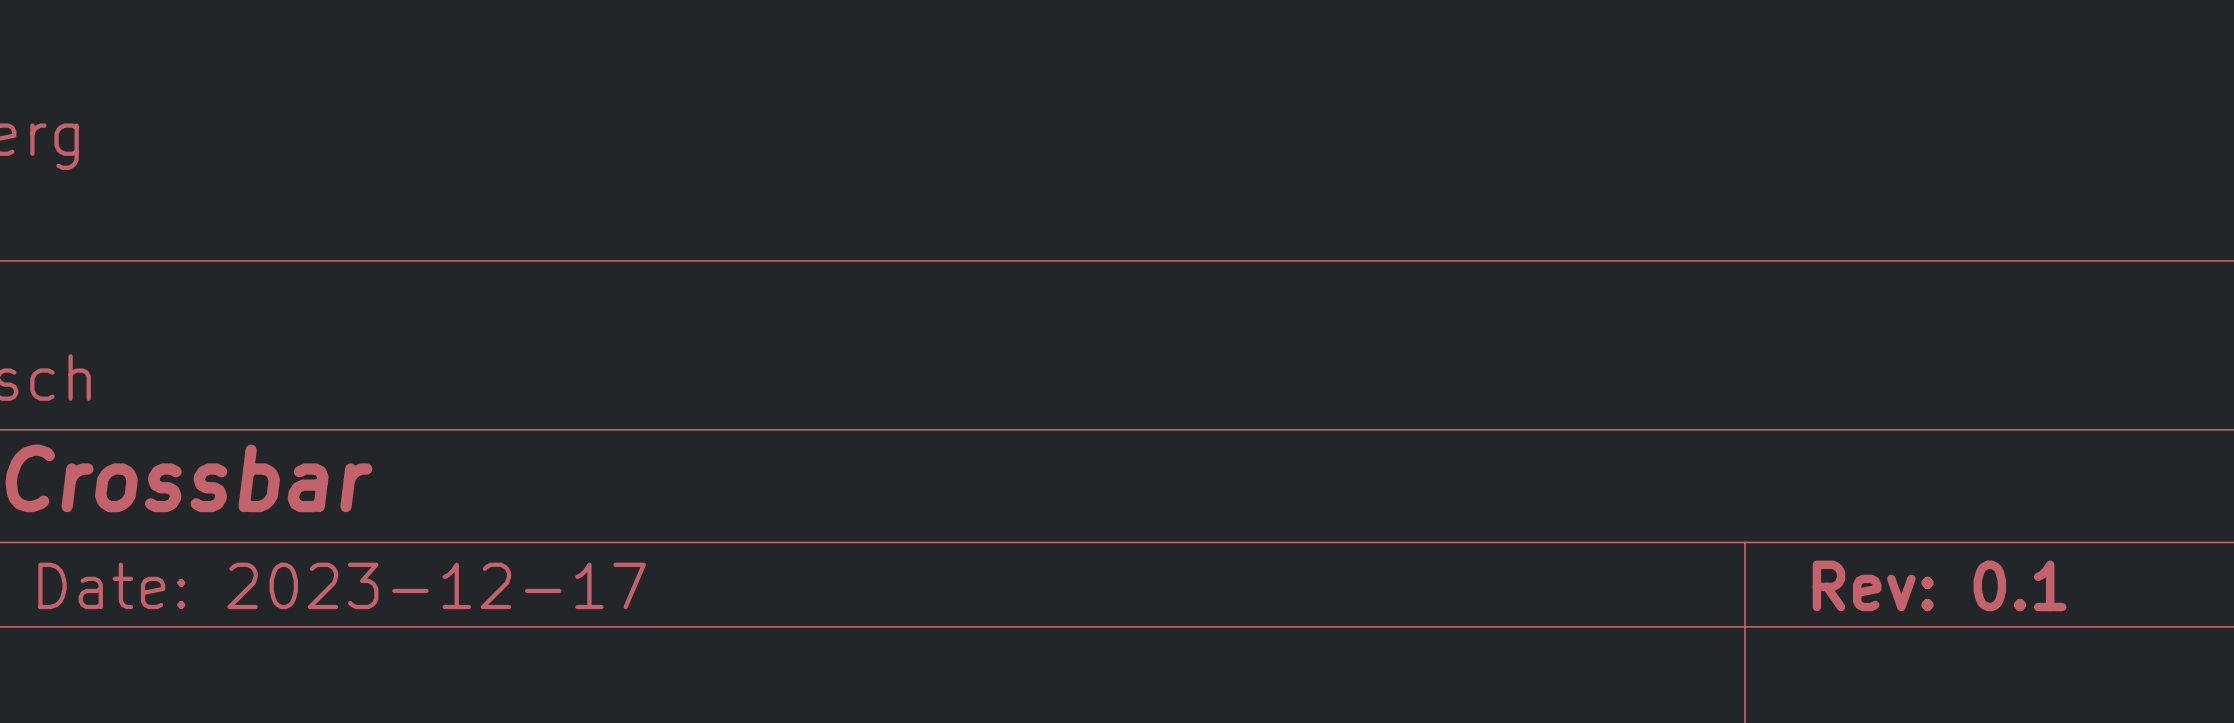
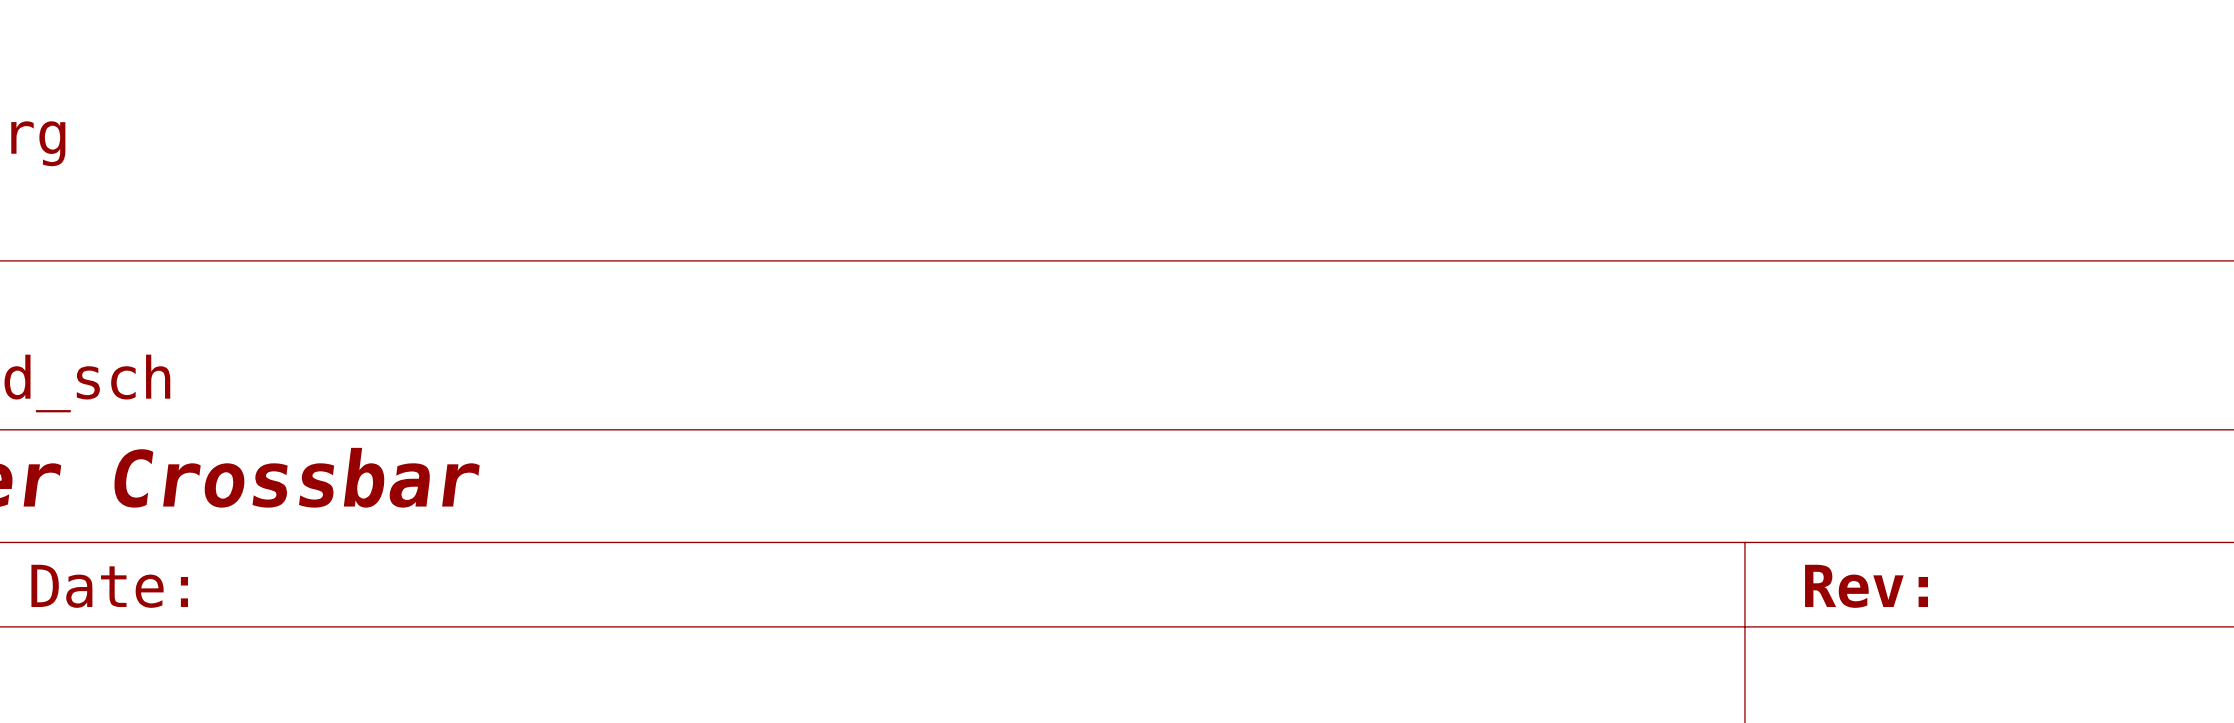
title block: Date: 2023-12-17 (342, 585) -> Date: (109, 586)
title block: Rev: 0.1 (1939, 585) -> Rev: (1866, 586)

